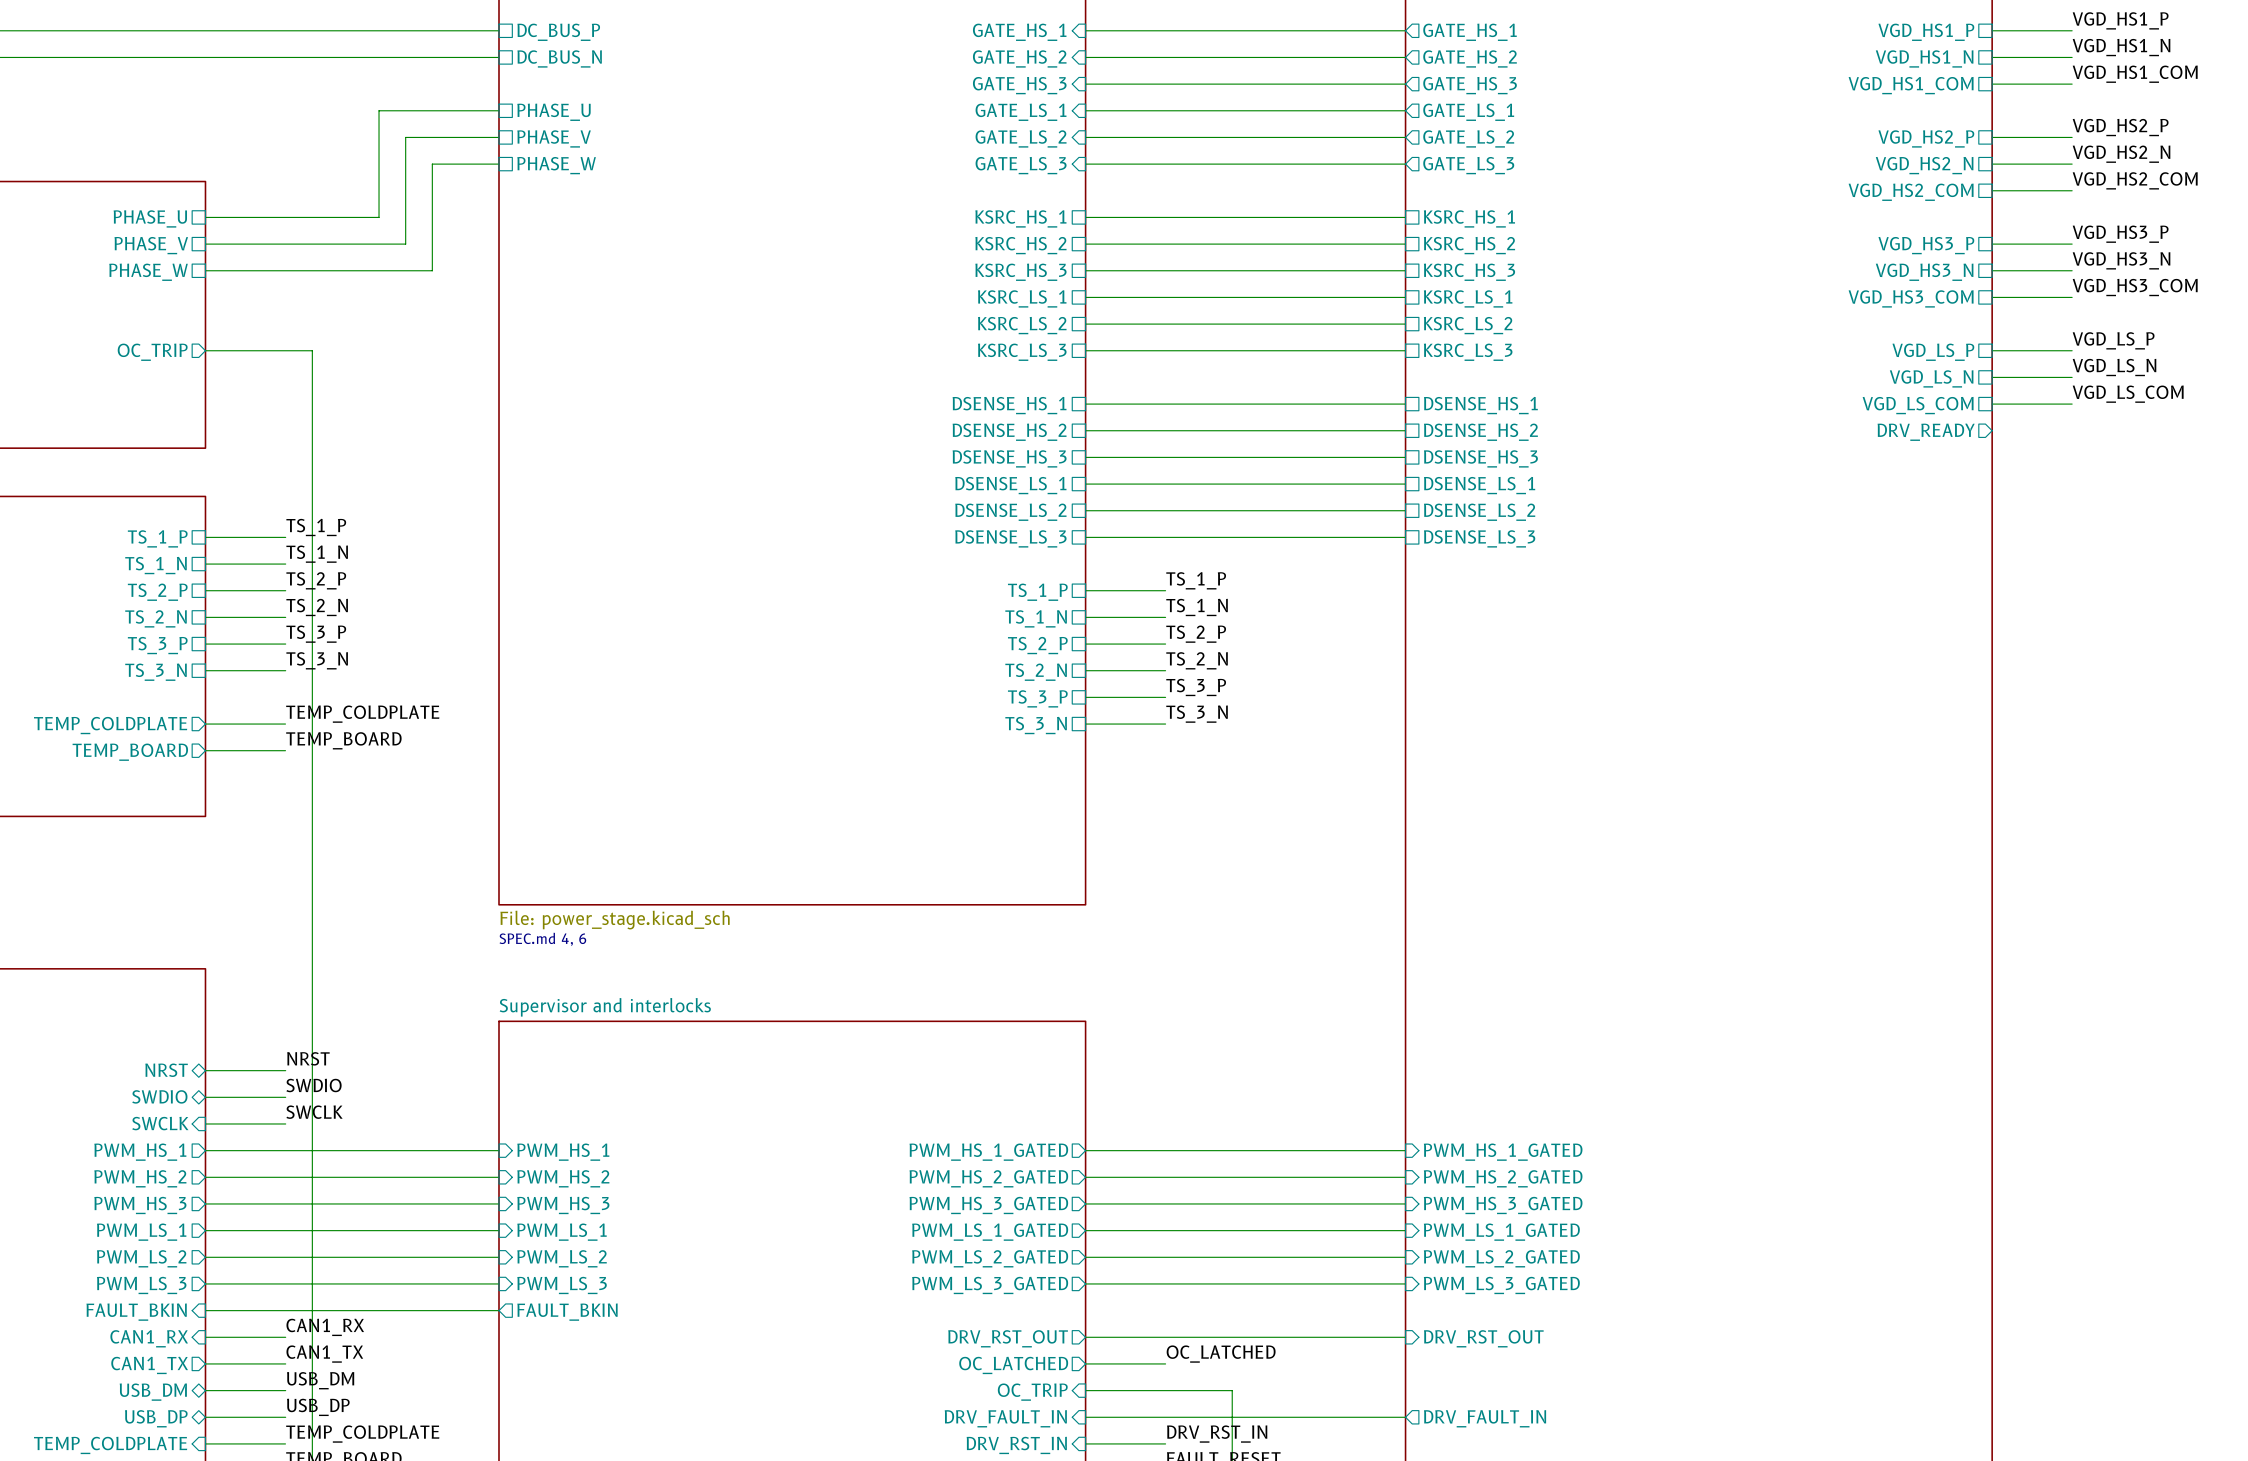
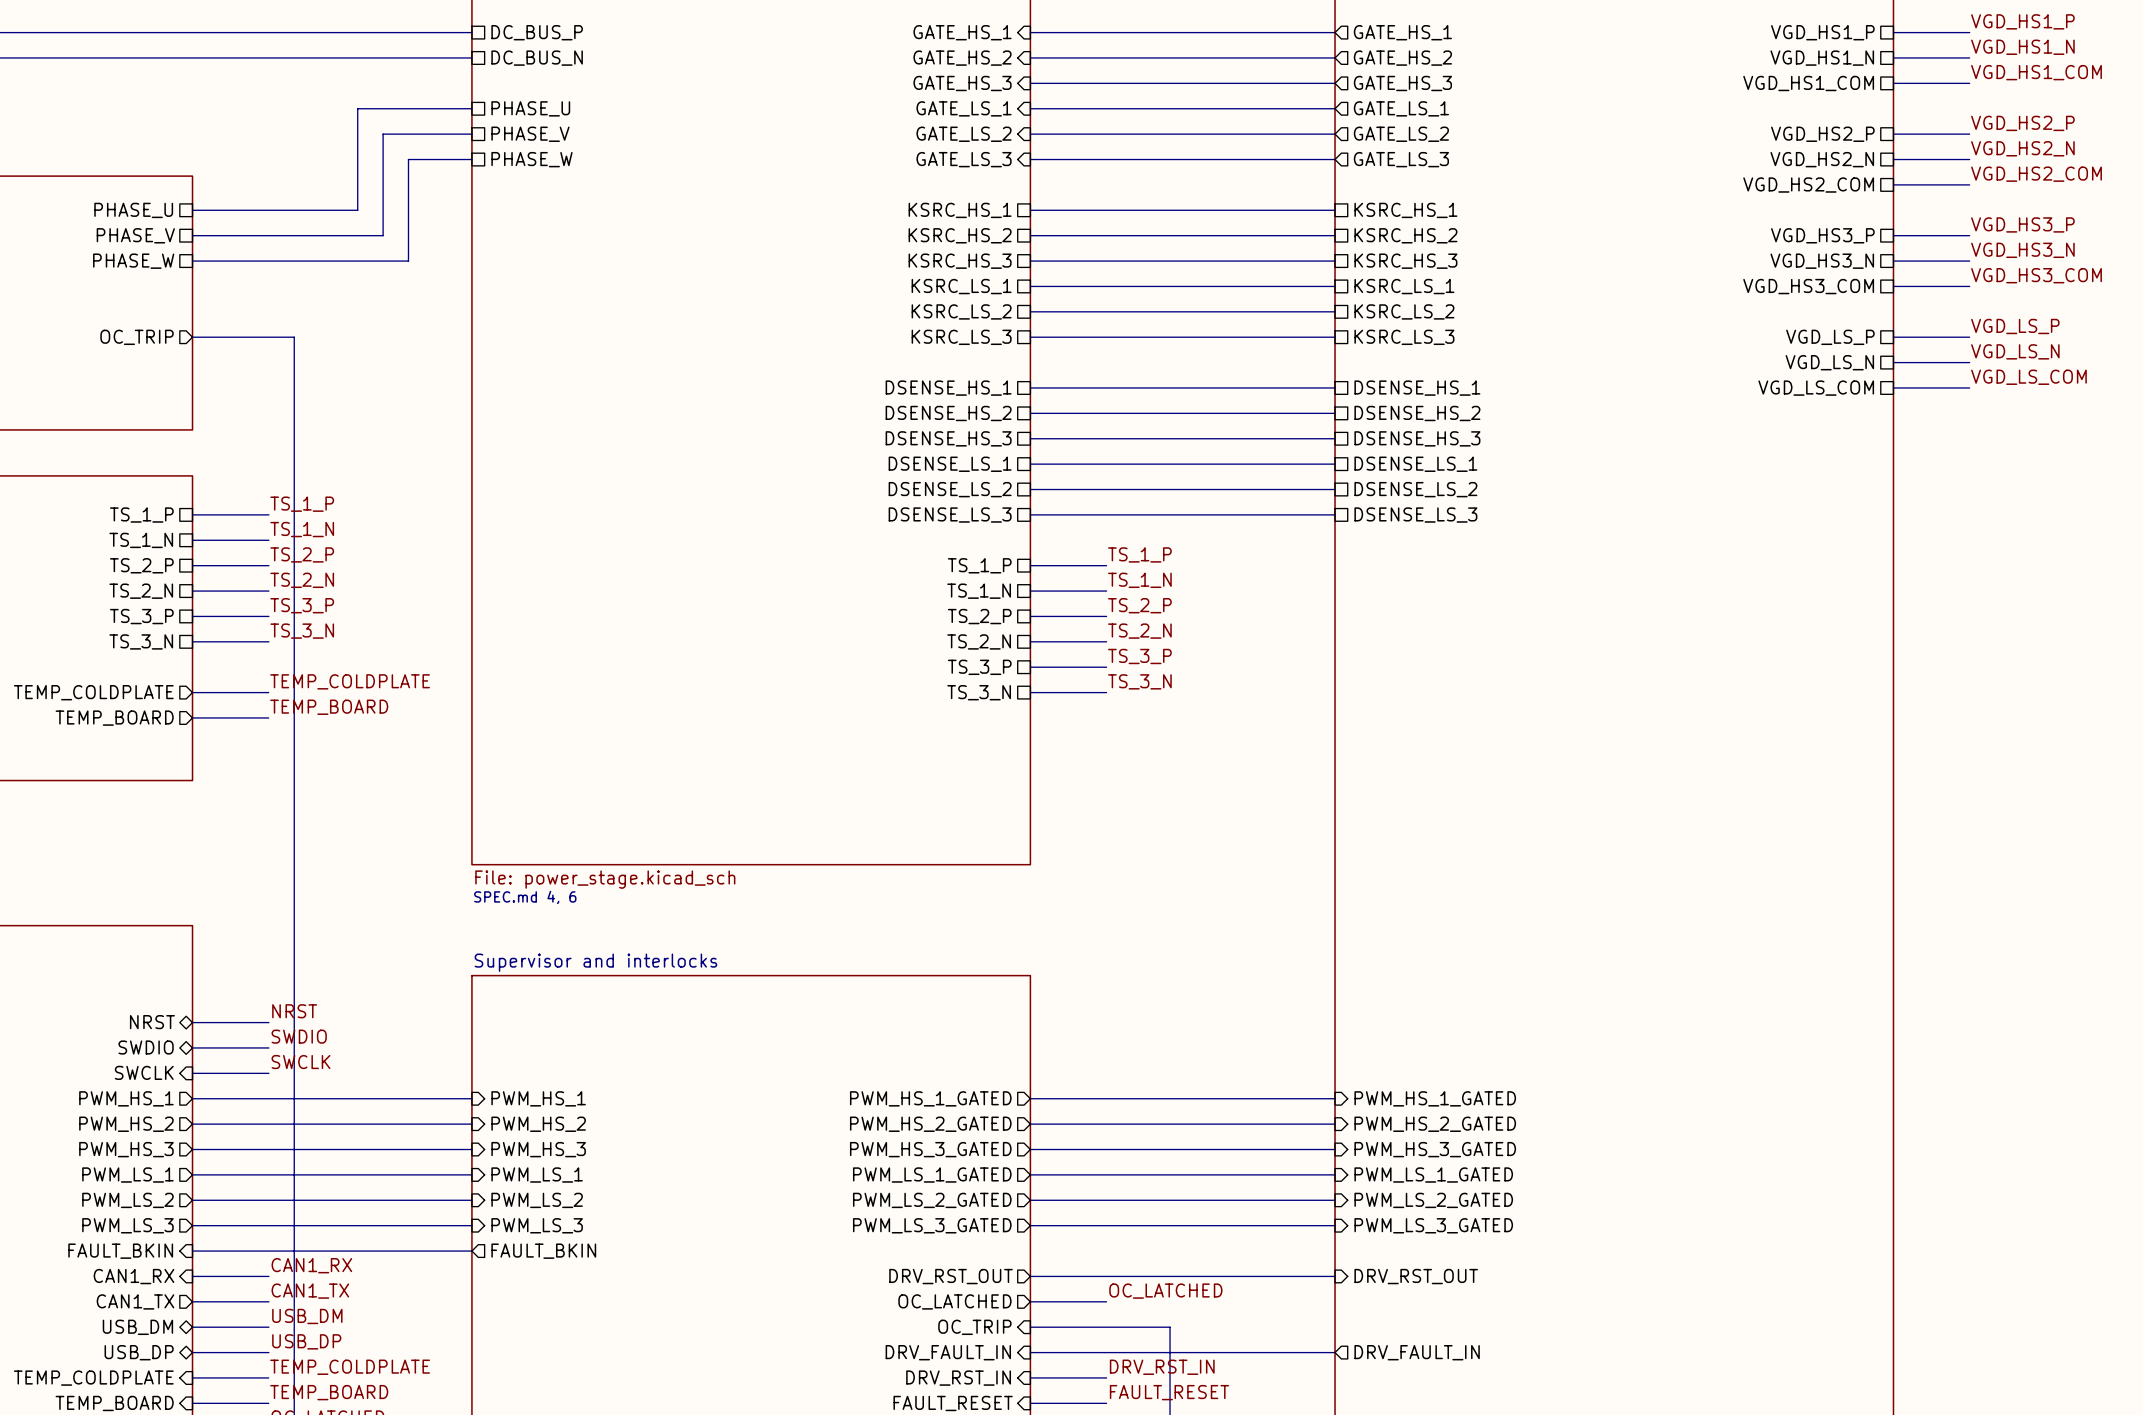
sheet pin: DRV_READY (1926, 432) -> none

